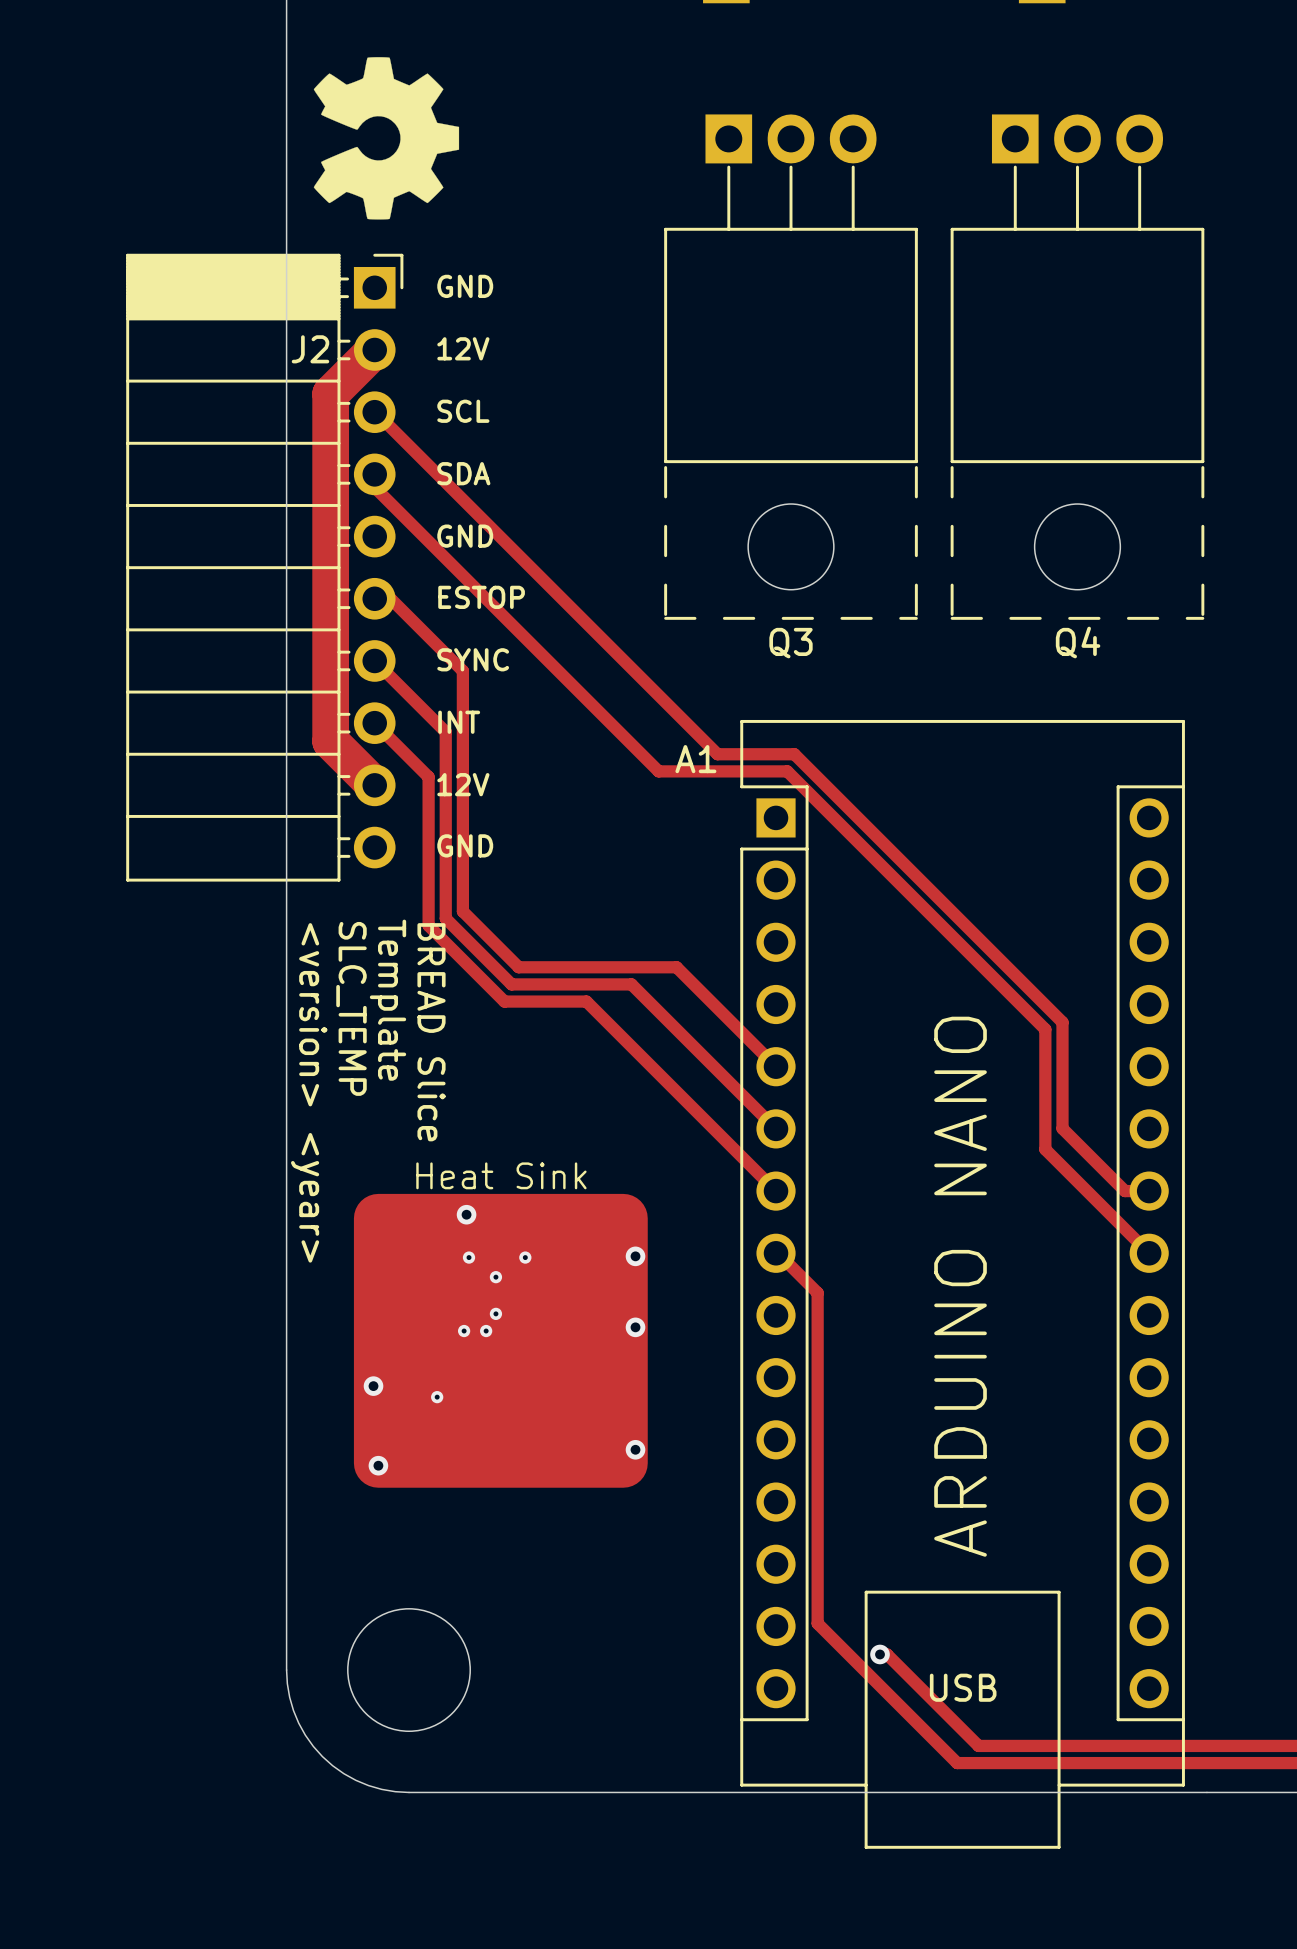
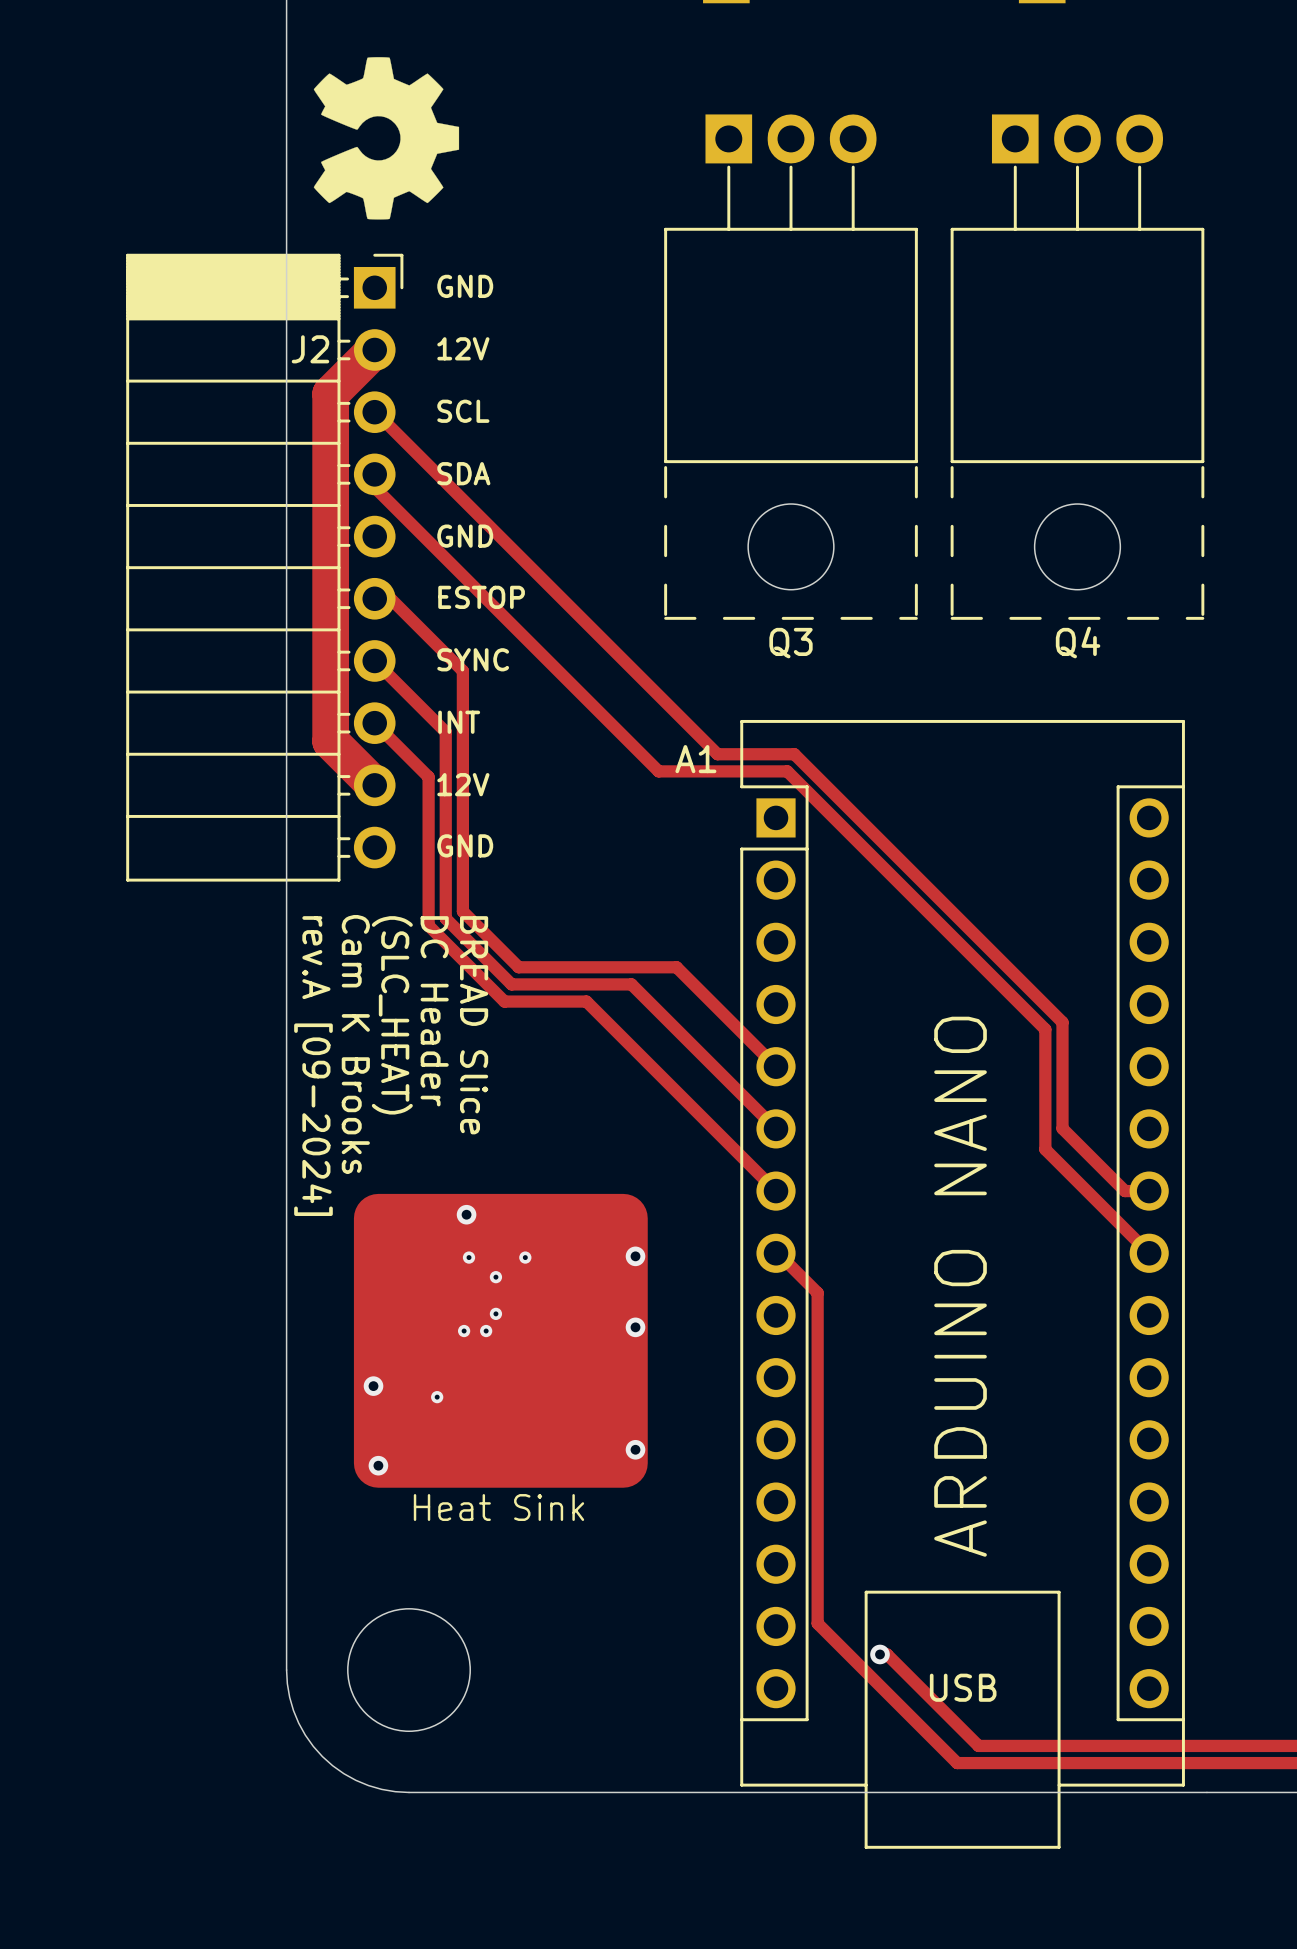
text: Template (388, 1000) -> (SLC_HEAT) (392, 1015)
text: SLC_TEMP (351, 1008) -> Cam K Brooks (355, 1044)
text: none -> BREAD Slice (474, 1025)
text: BREAD Slice (431, 1032) -> DC Header (434, 1011)
text: <version> <year> (309, 1092) -> rev.A [09-2024] (313, 1066)
part text position: Heat Sink (501, 1175) -> Heat Sink (498, 1507)

